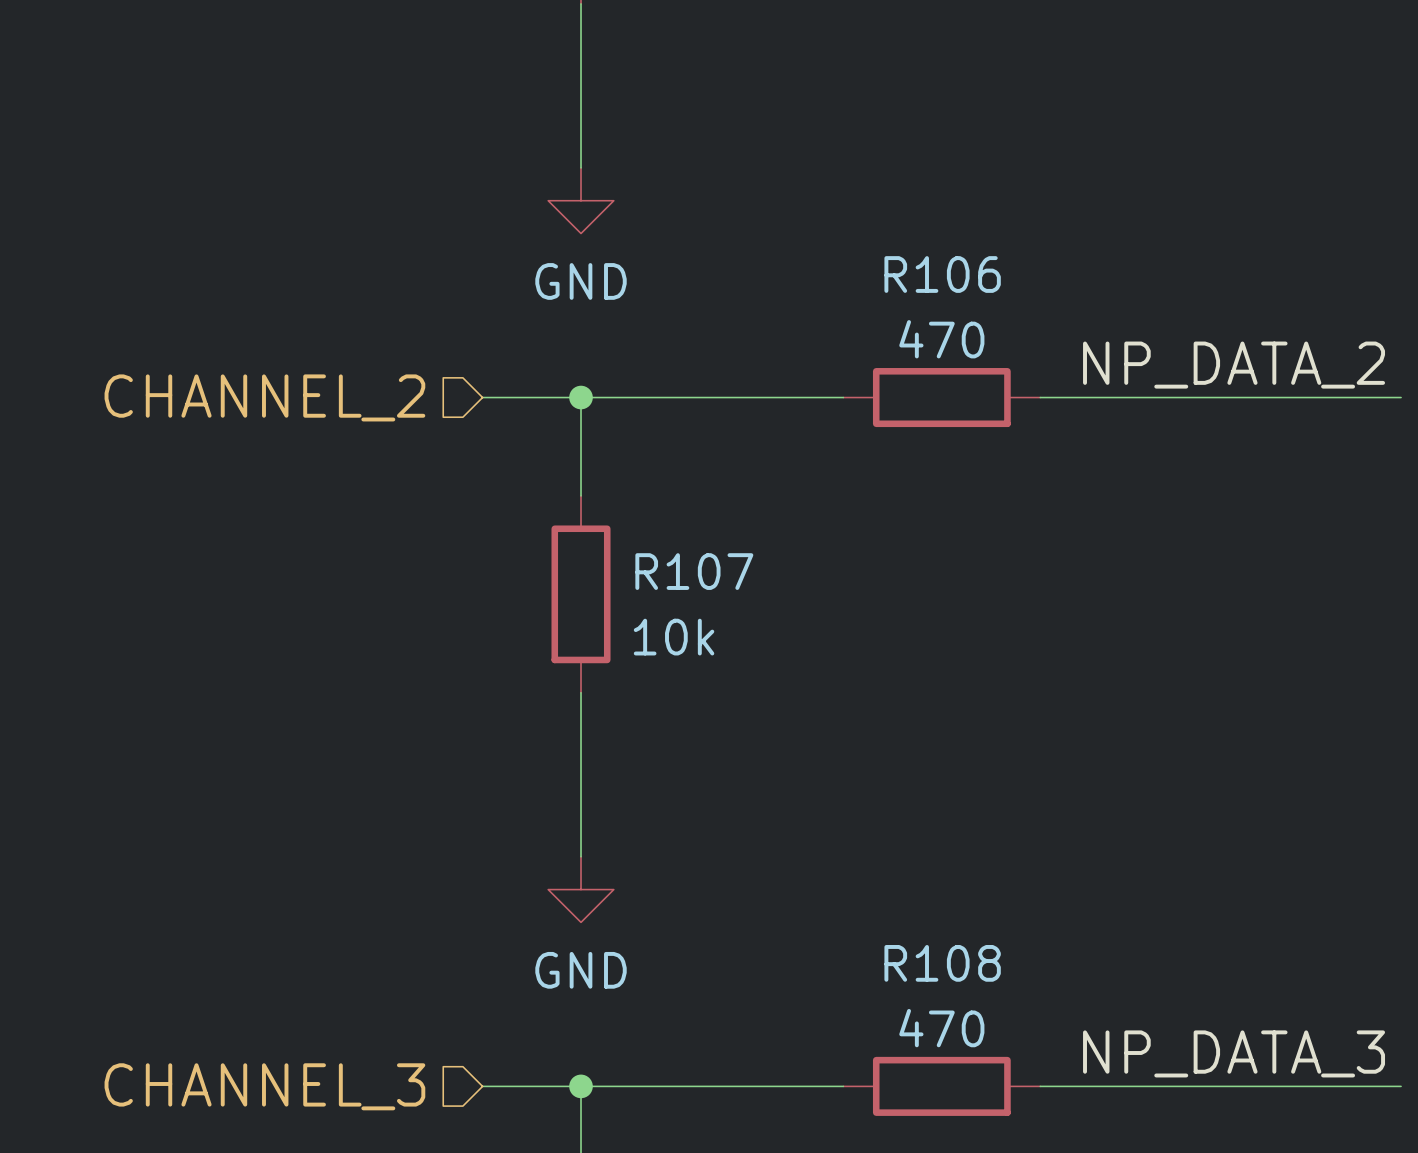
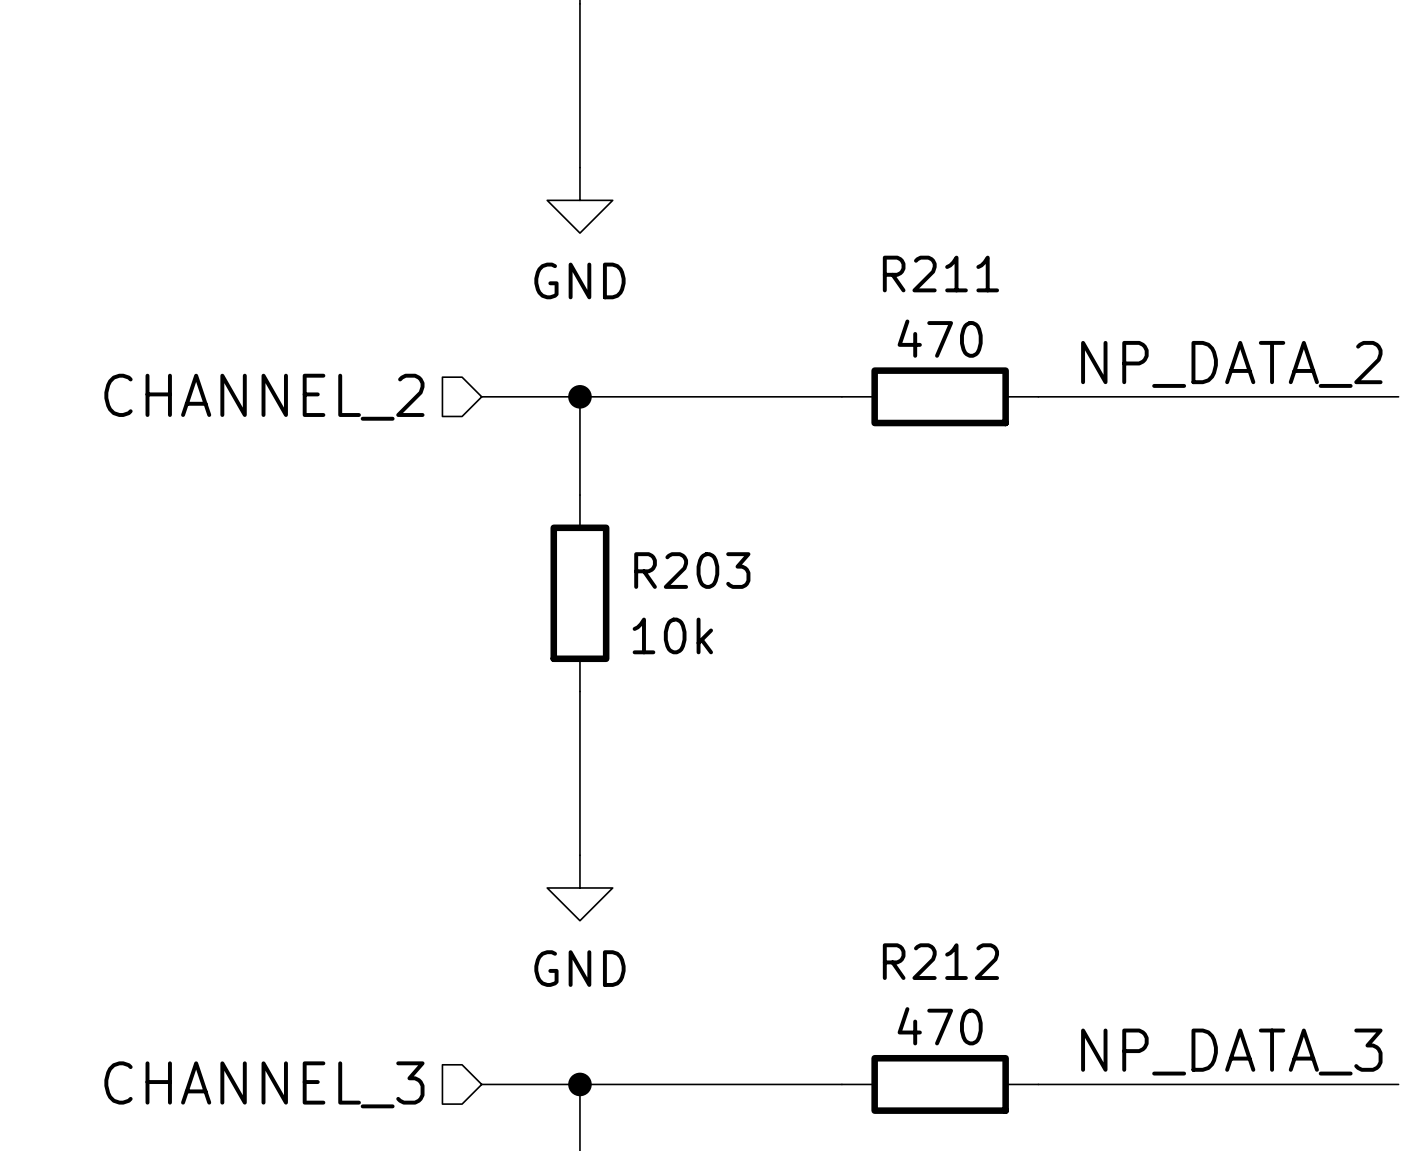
R106 name: R106 (942, 274) -> R211 (940, 274)
R107 name: R107 (694, 571) -> R203 (692, 570)
R108 name: R108 (942, 963) -> R212 (940, 961)

